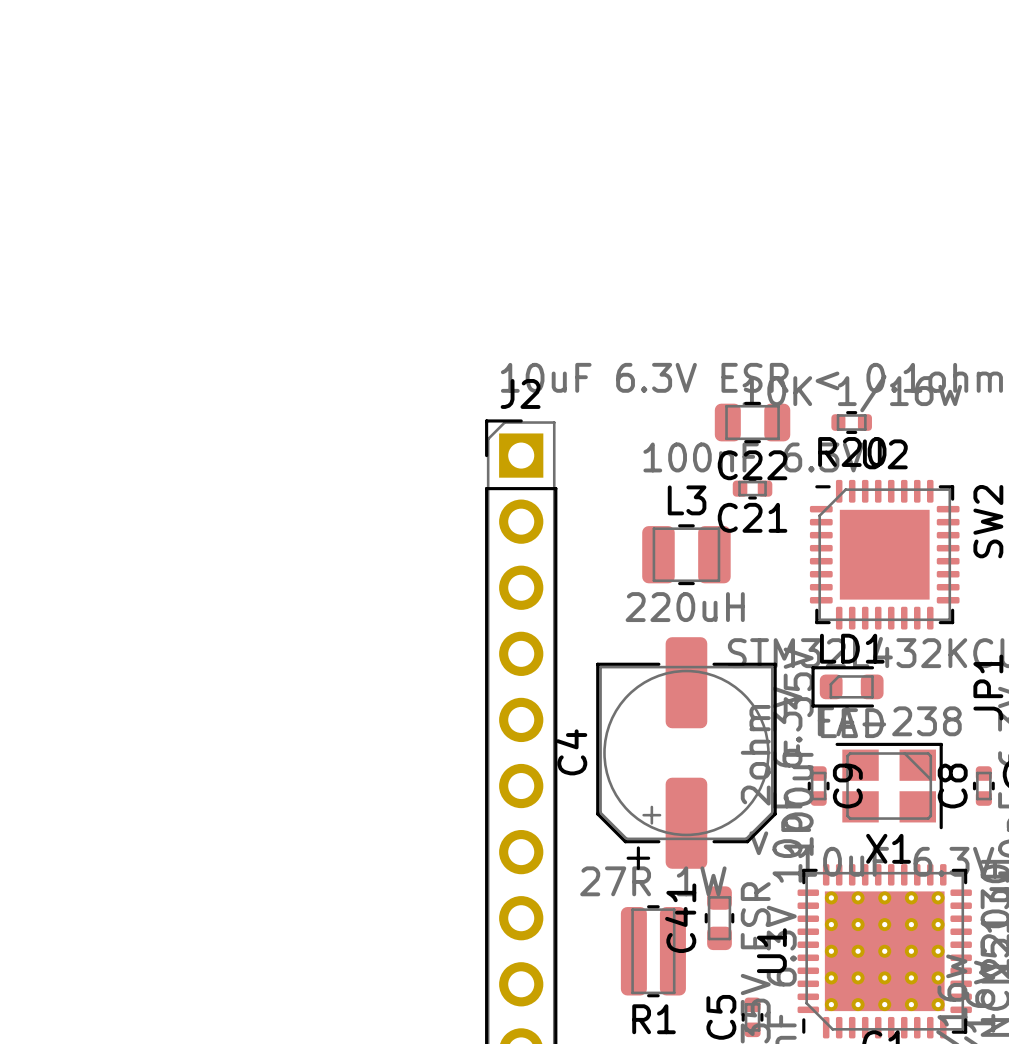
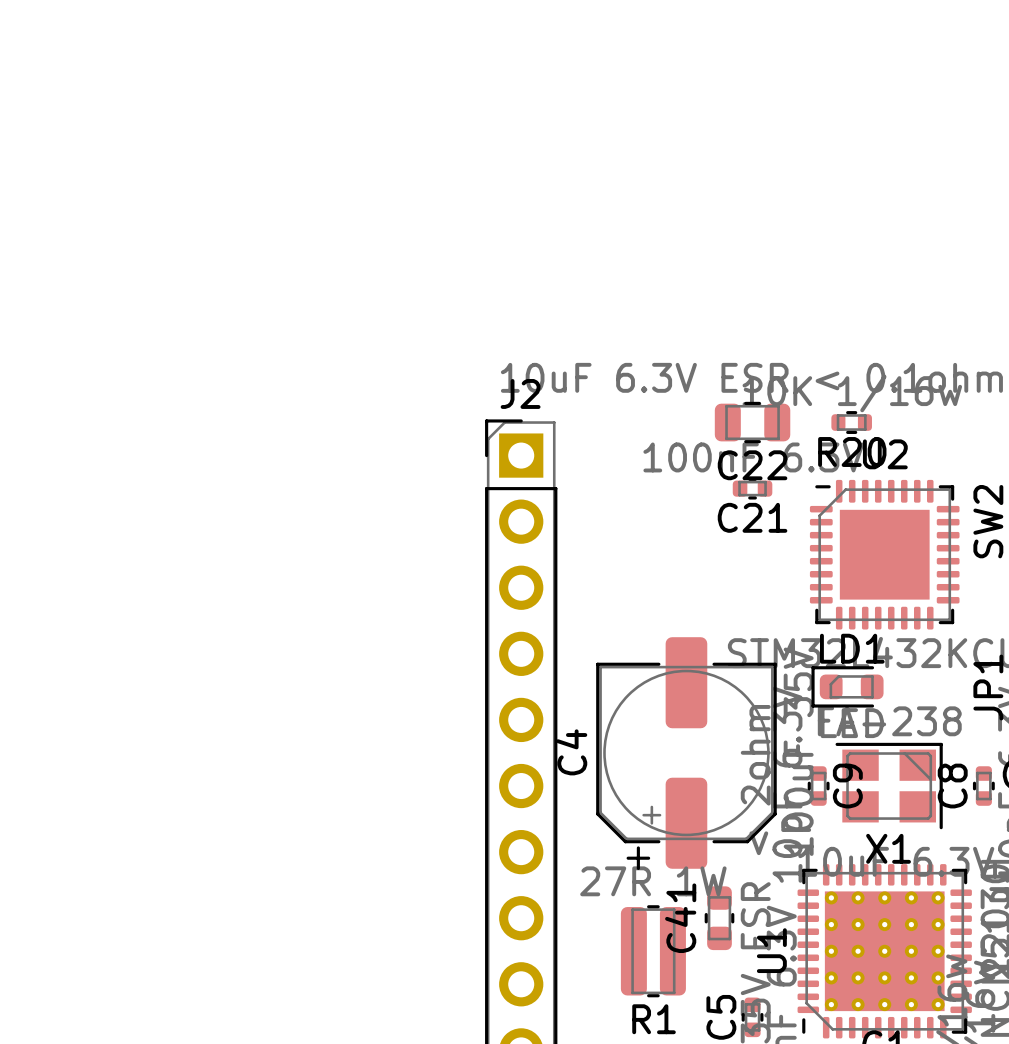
L3: 220uH (686, 554) -> none

